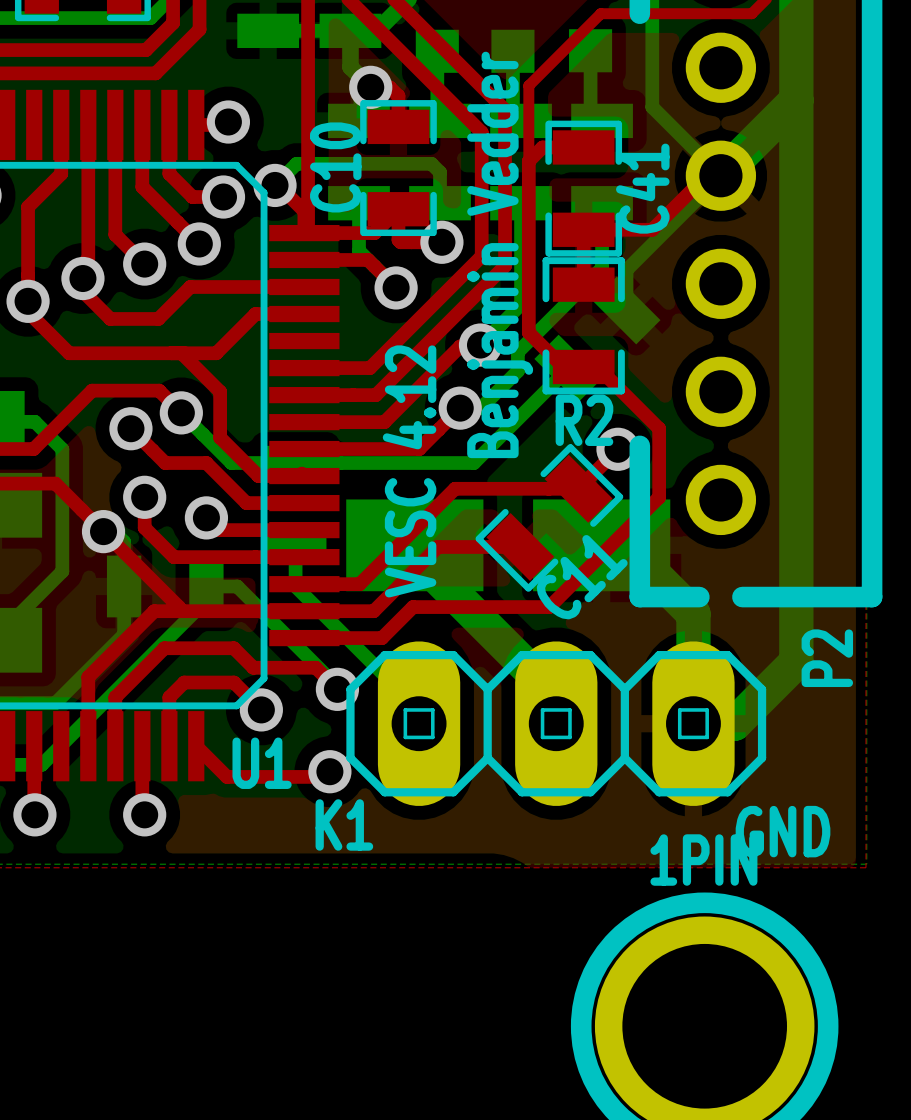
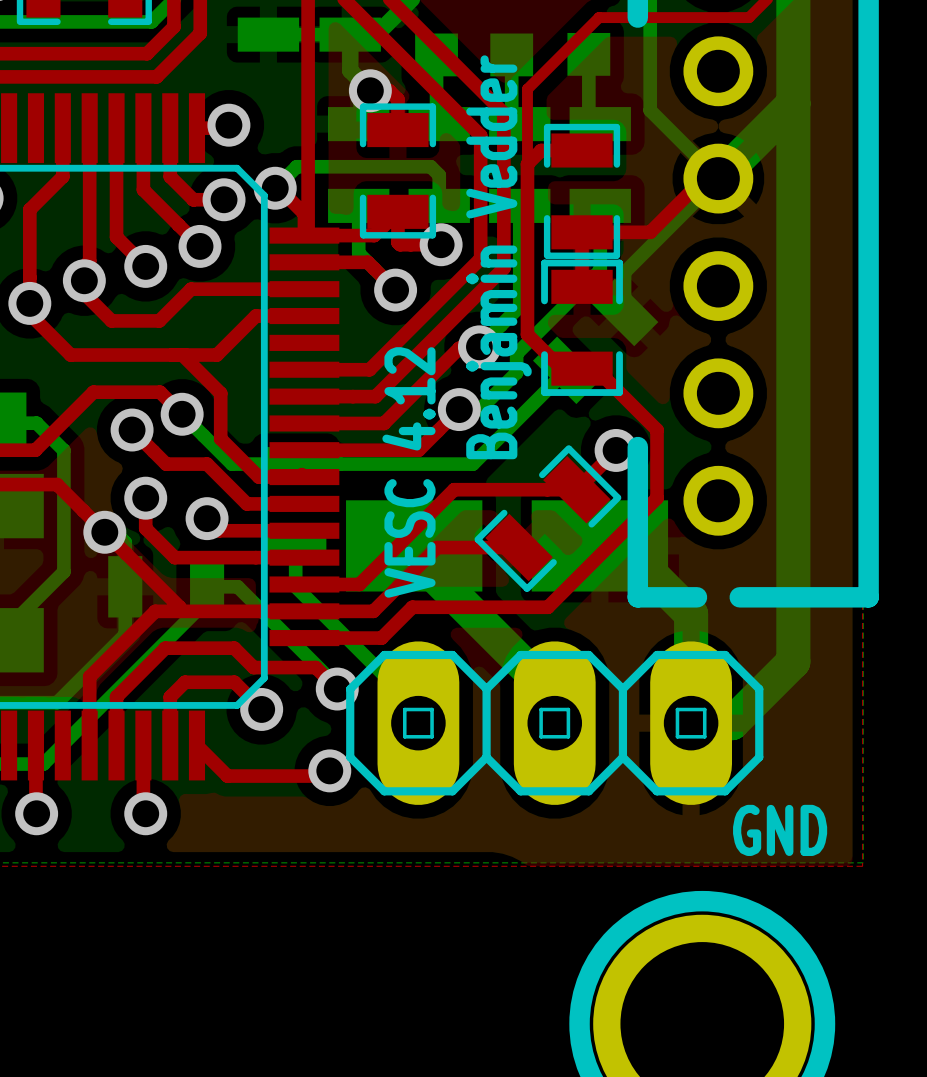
C10 name: C10 (335, 167) -> none
C41 name: C41 (642, 188) -> none
R2 name: R2 (584, 420) -> none
C11 name: C11 (582, 577) -> none
P2 name: P2 (827, 658) -> none
U1 name: U1 (262, 763) -> none
K1 name: K1 (344, 824) -> none
1PIN name: 1PIN (703, 860) -> none

